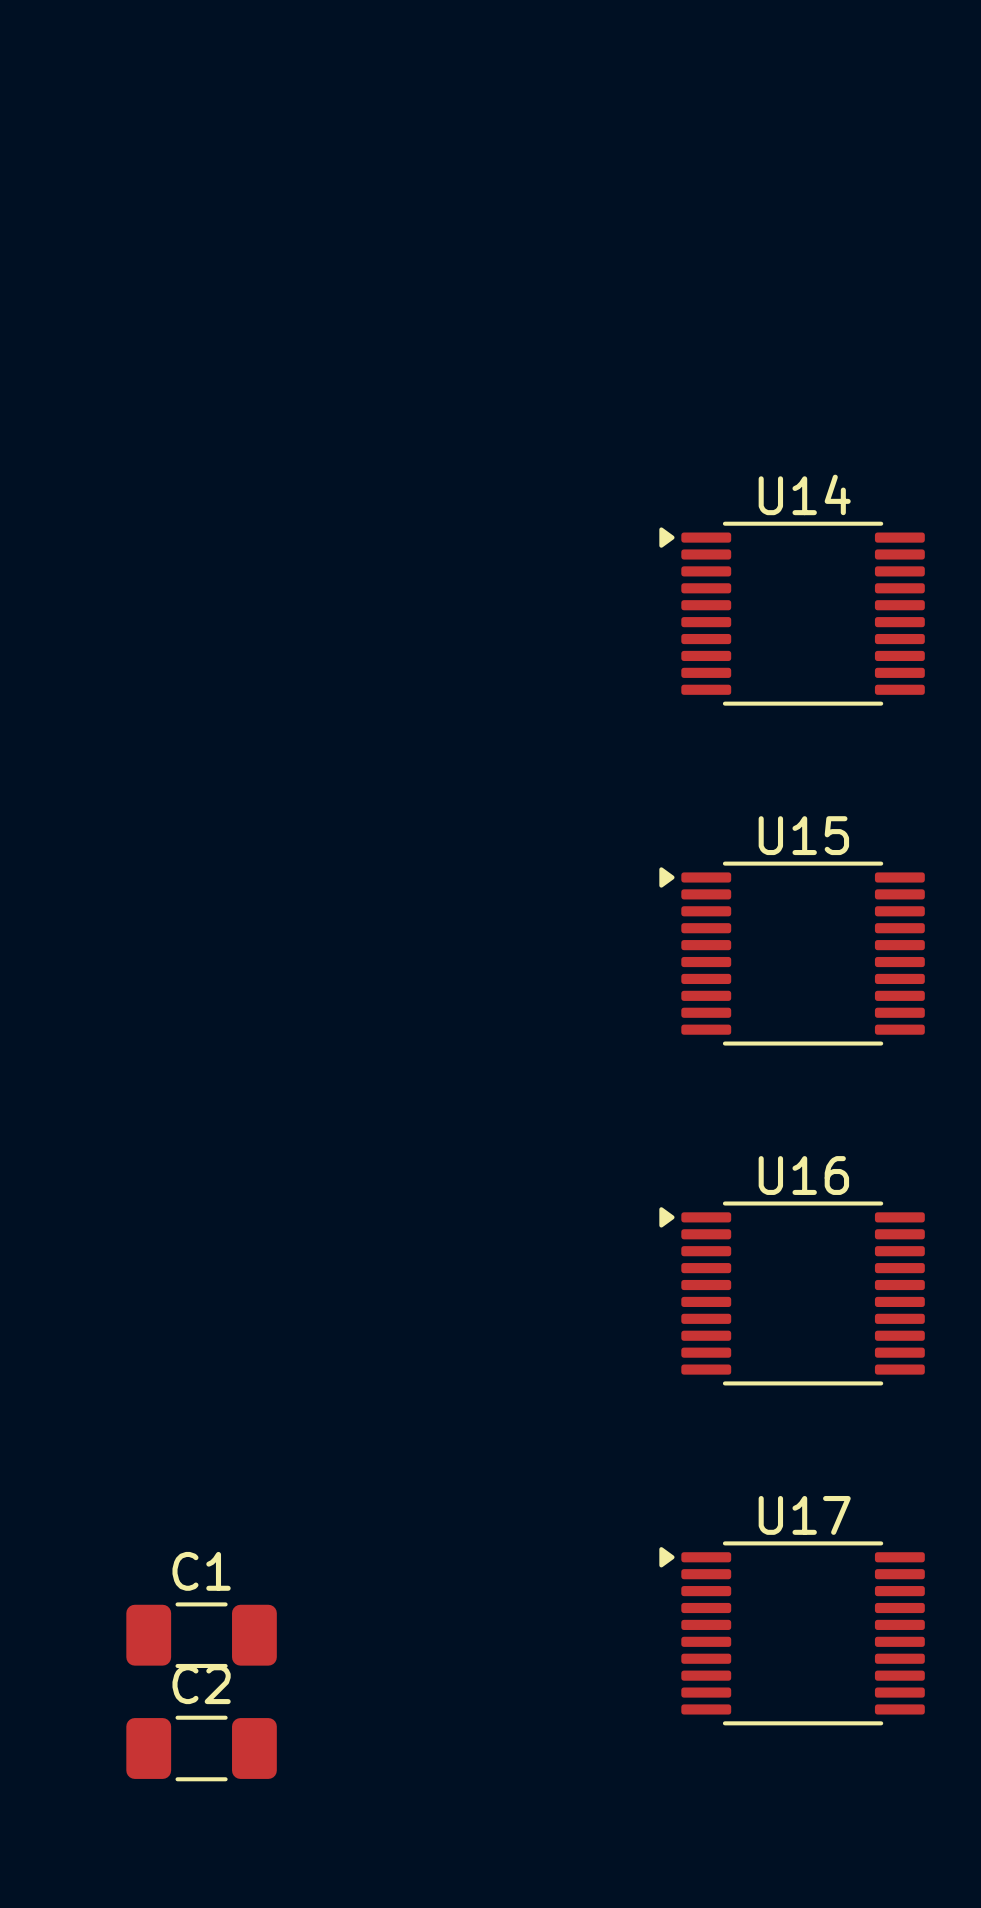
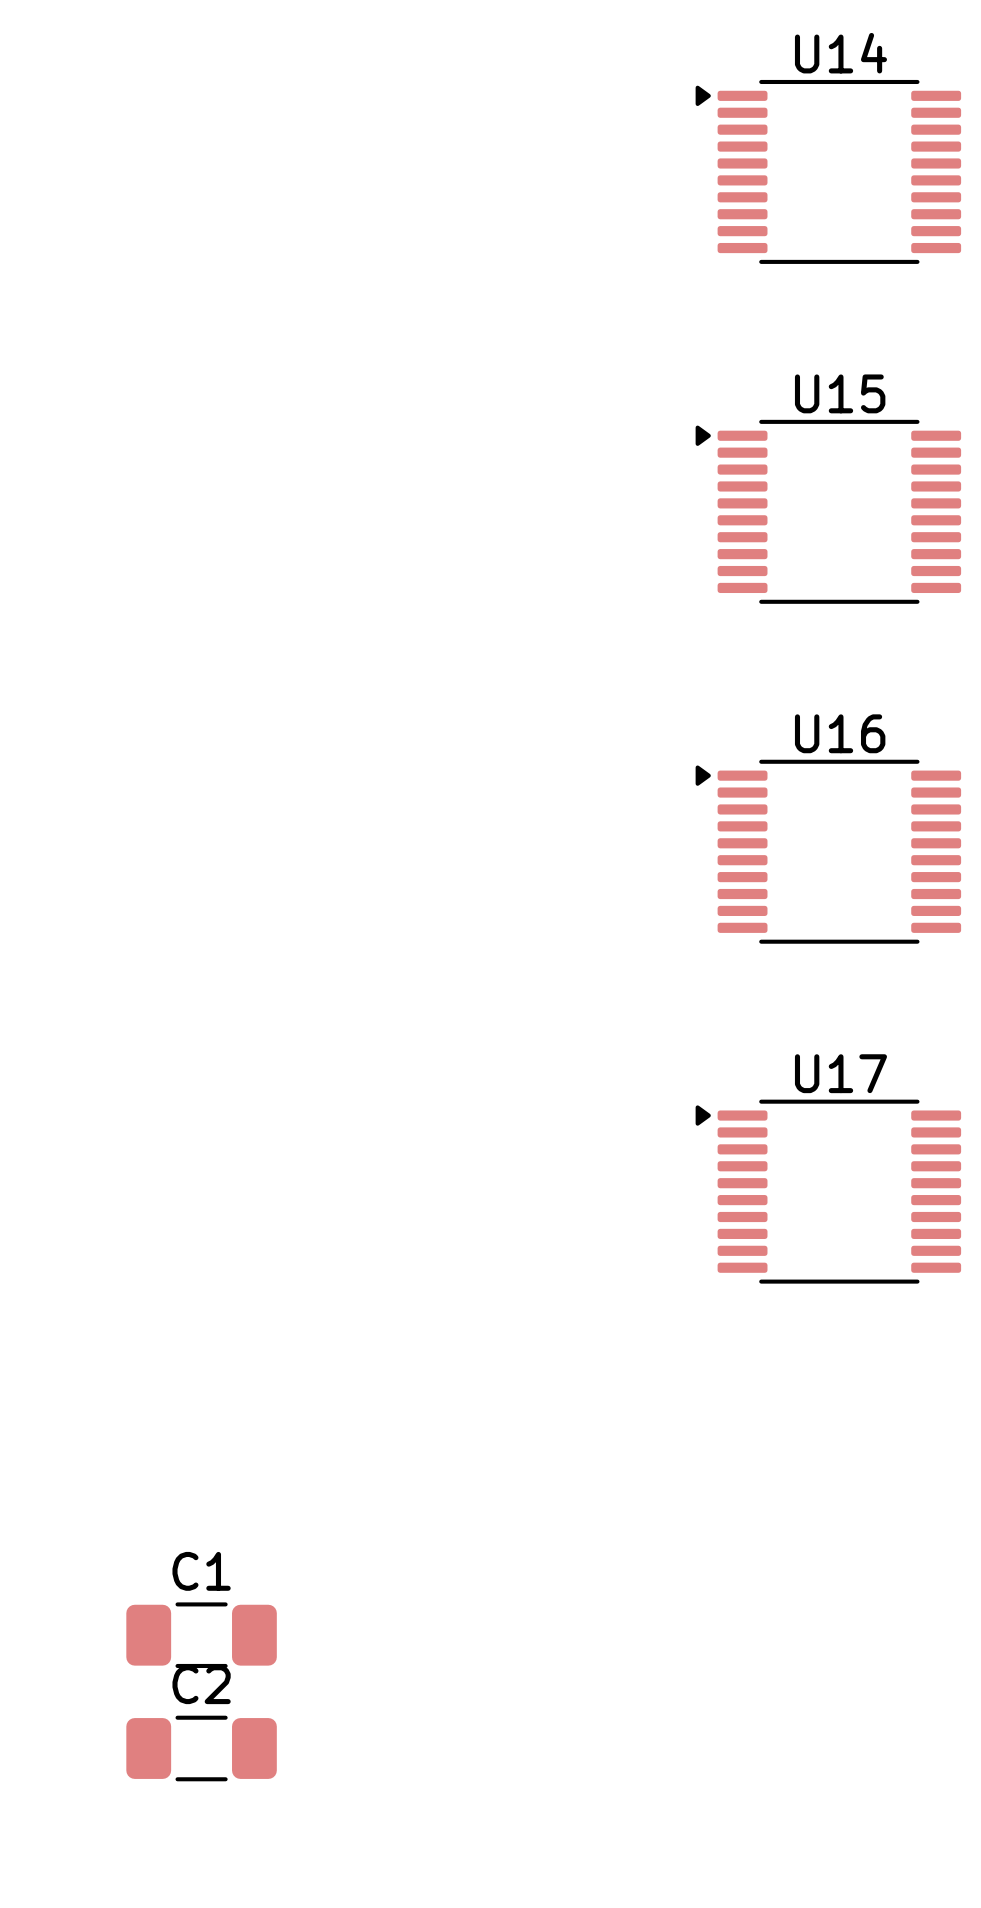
U14 position: (792, 613) -> (828, 171)
U15 position: (792, 953) -> (828, 511)
U16 position: (792, 1293) -> (828, 851)
U17 position: (792, 1633) -> (828, 1191)

